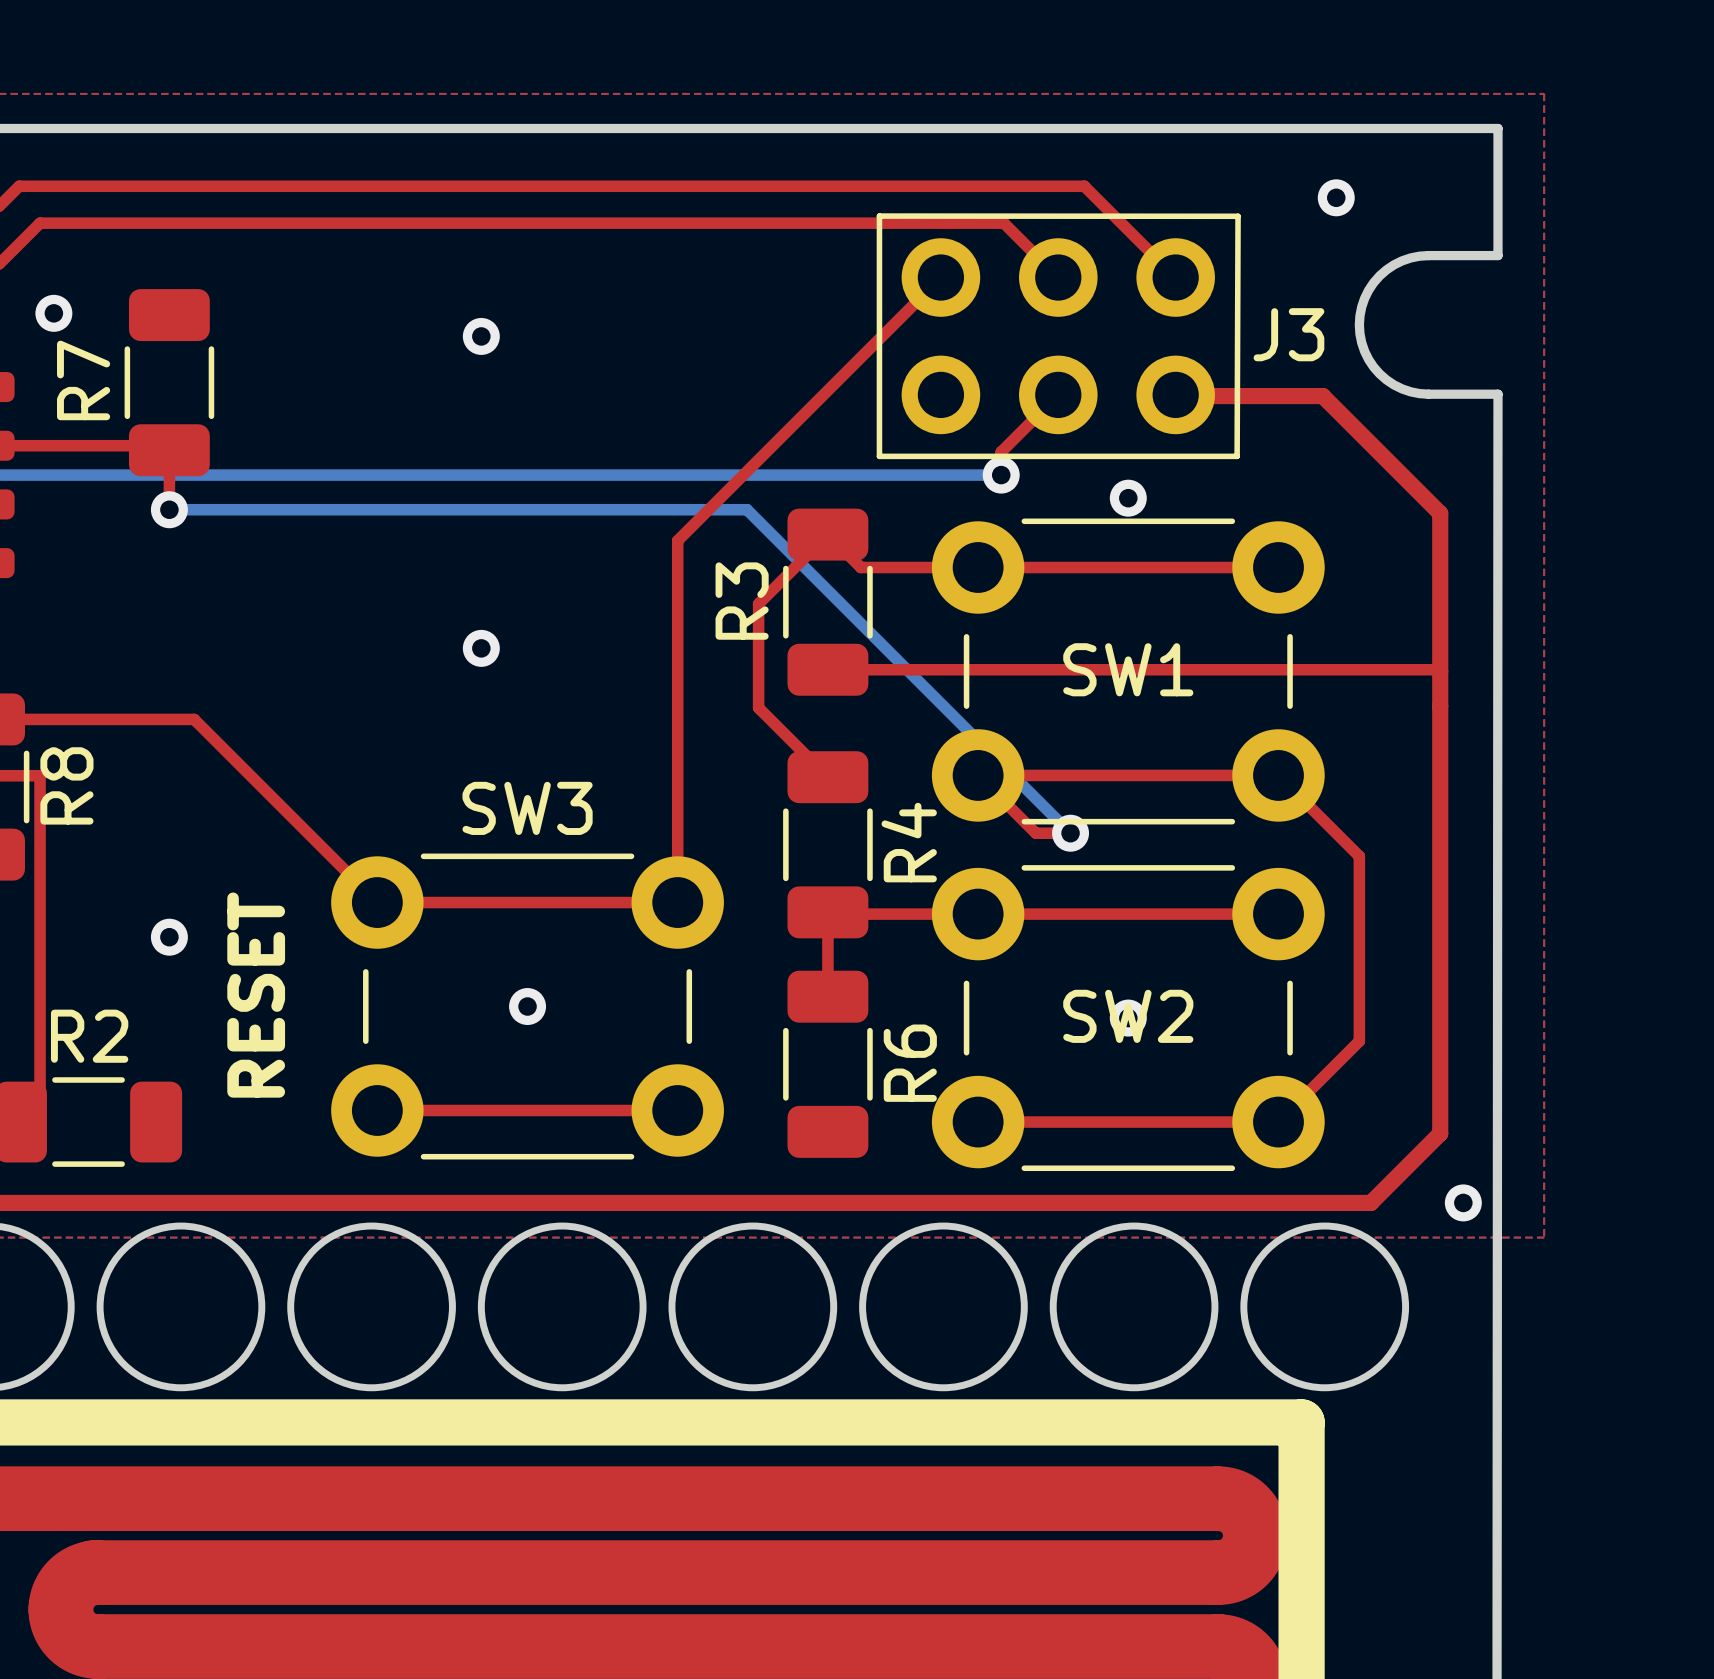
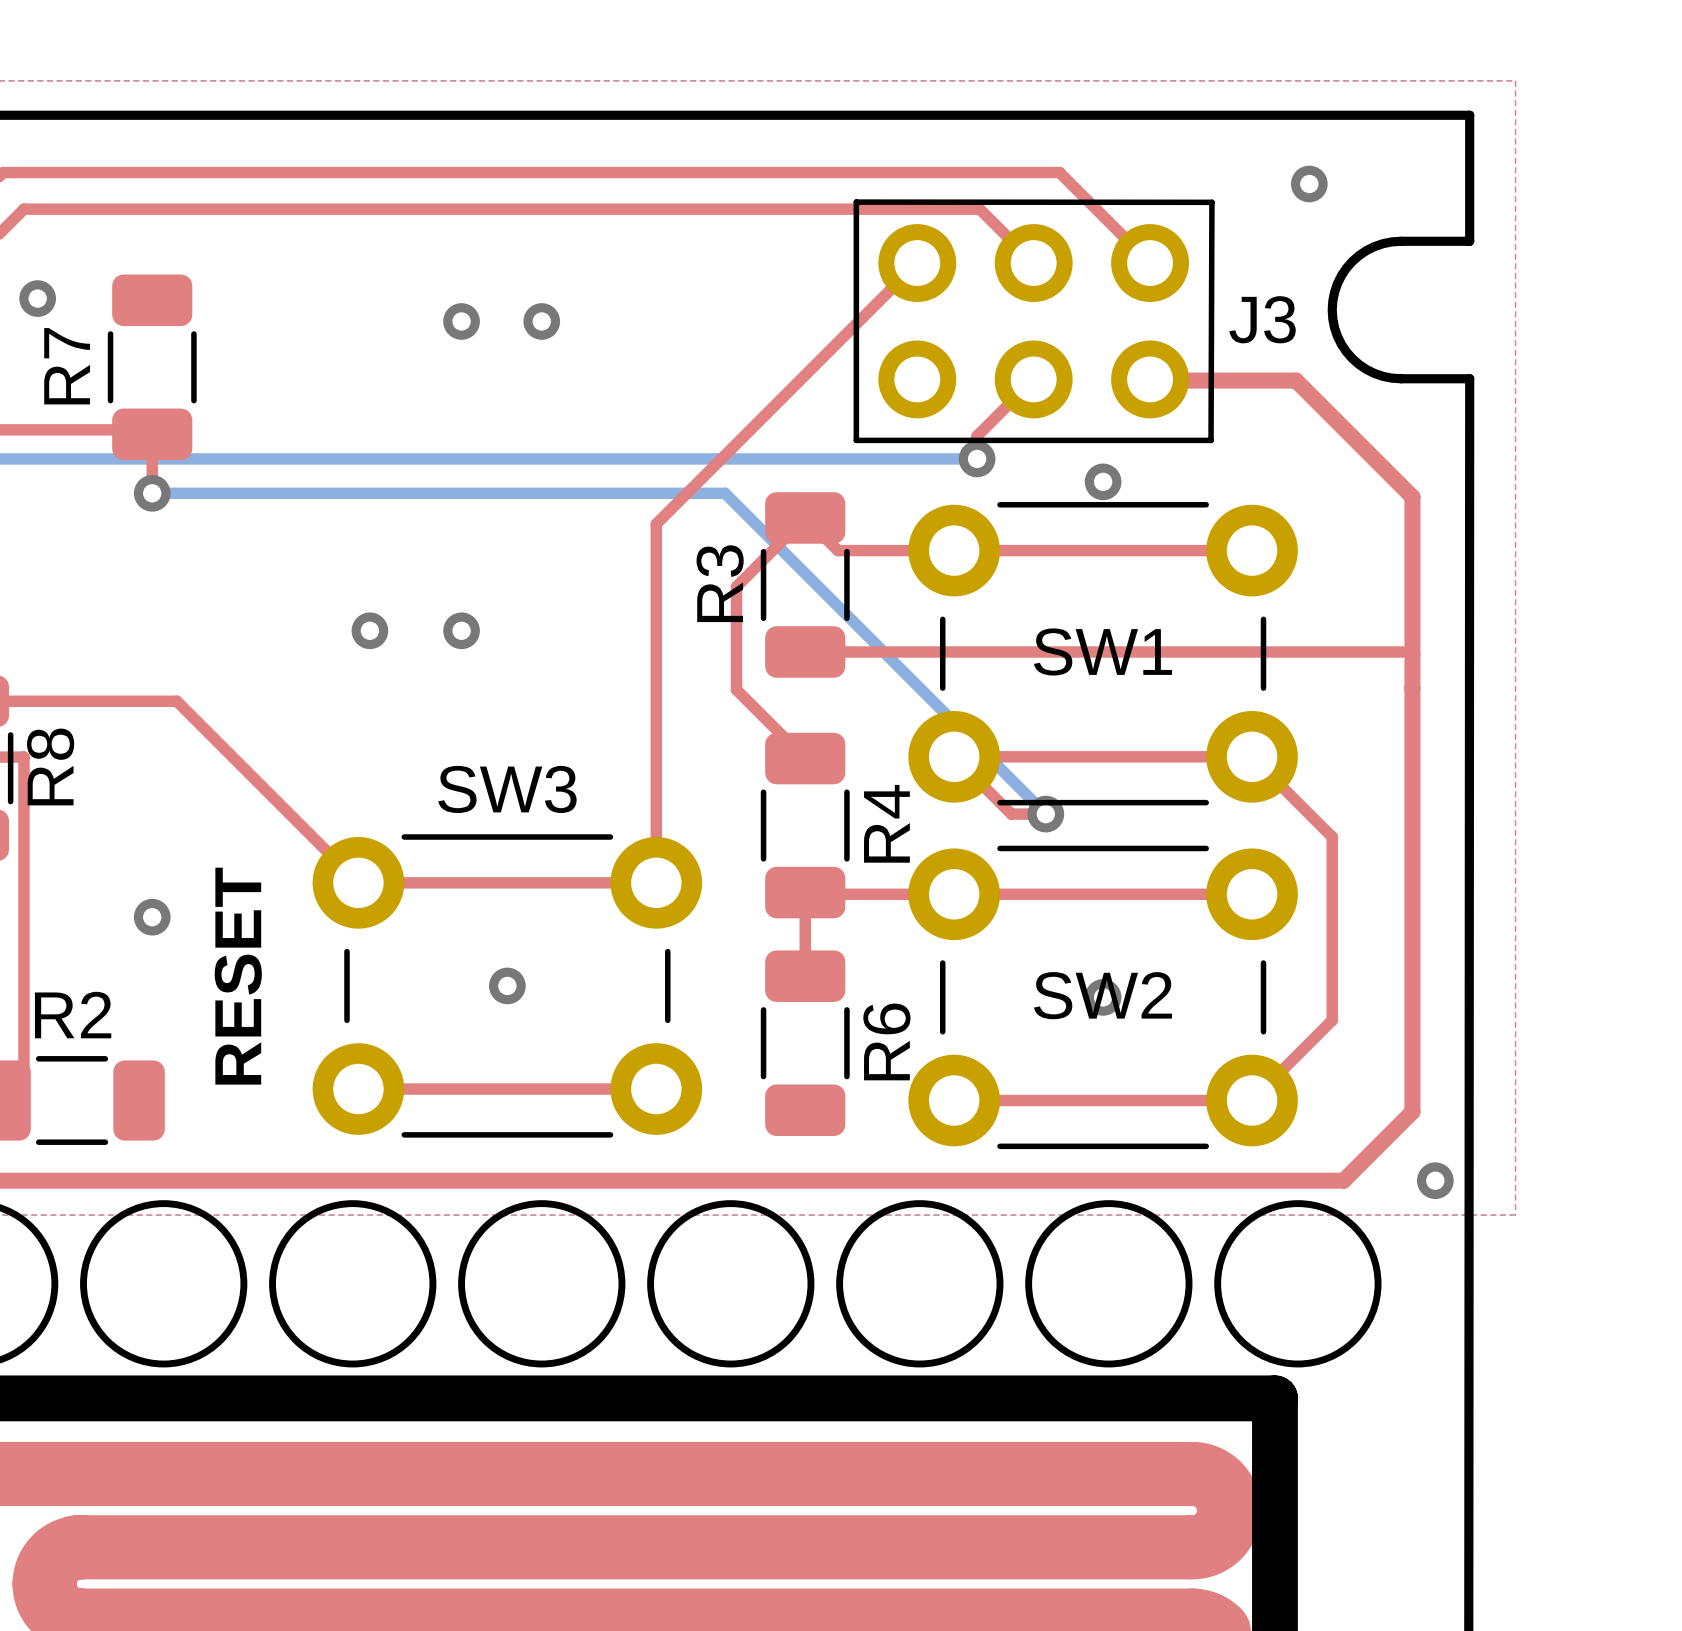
via: none -> (541, 321)
via: none -> (369, 630)

